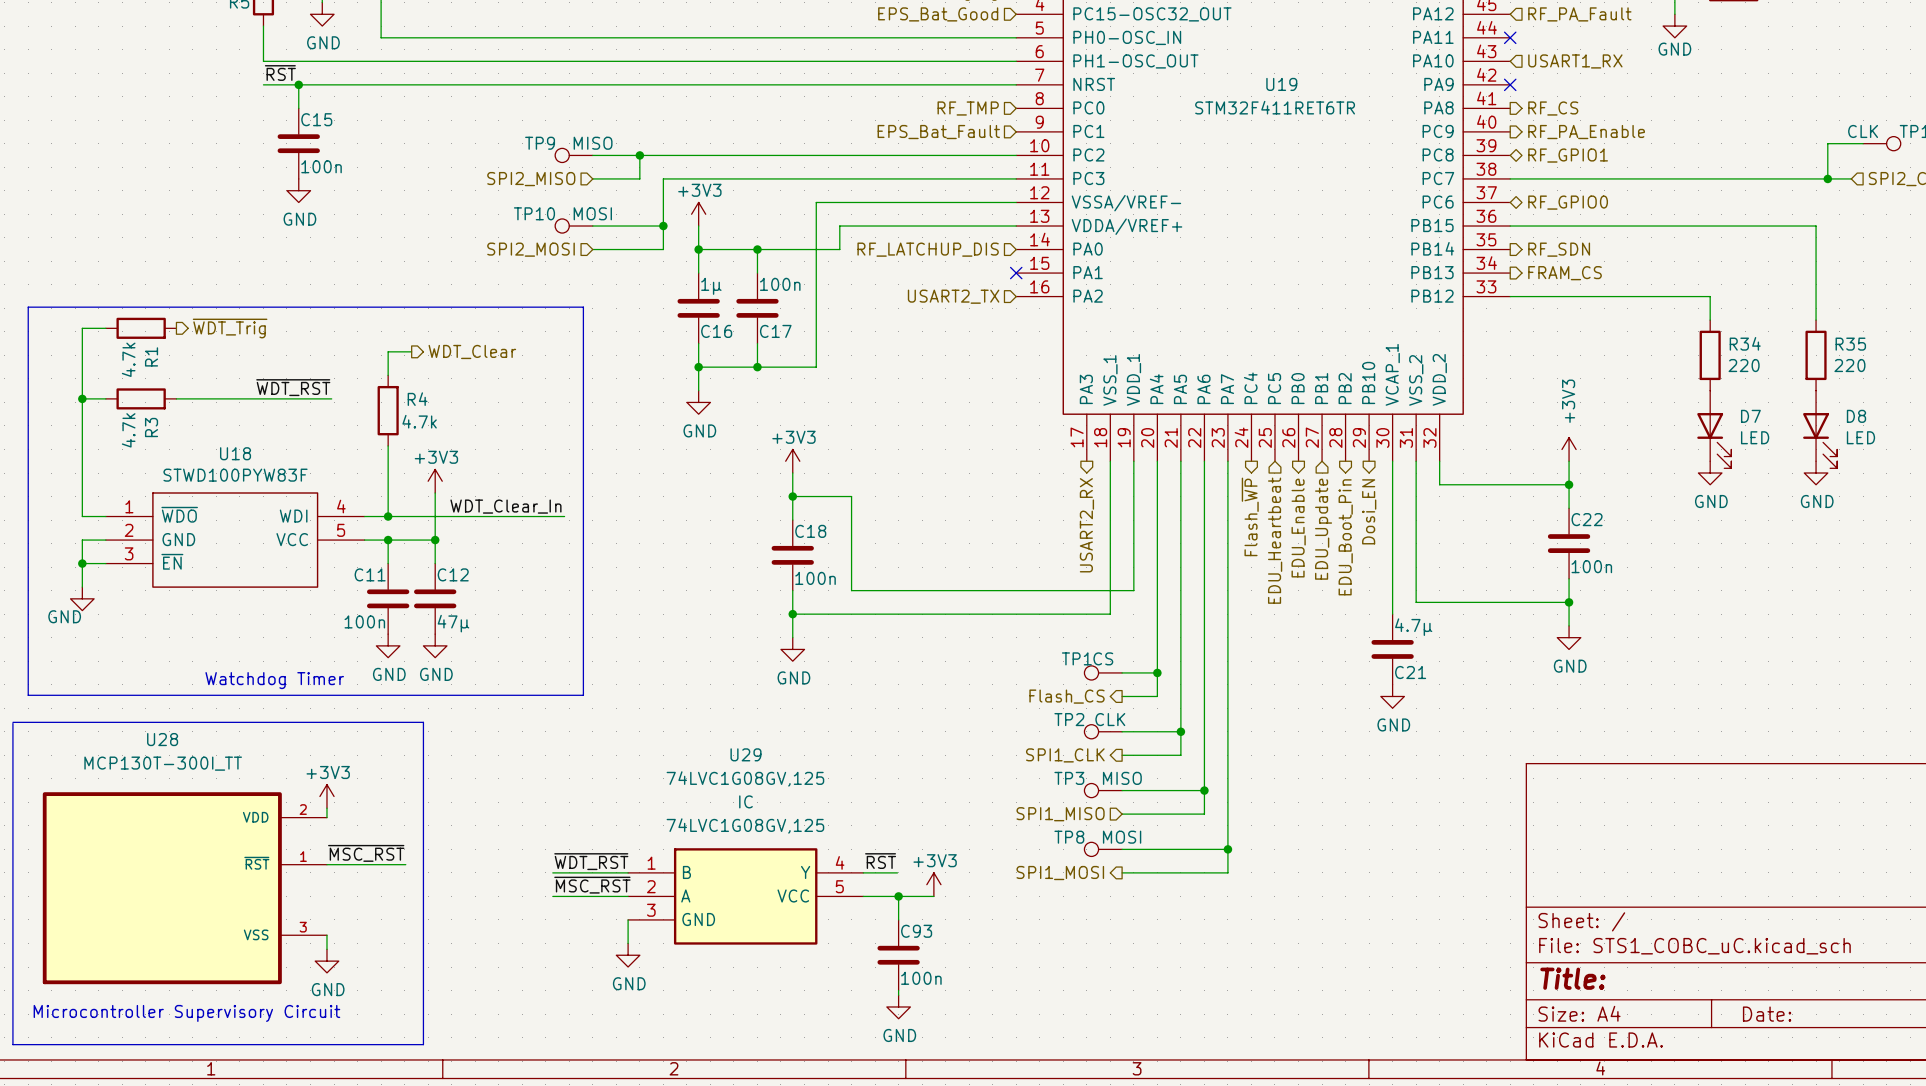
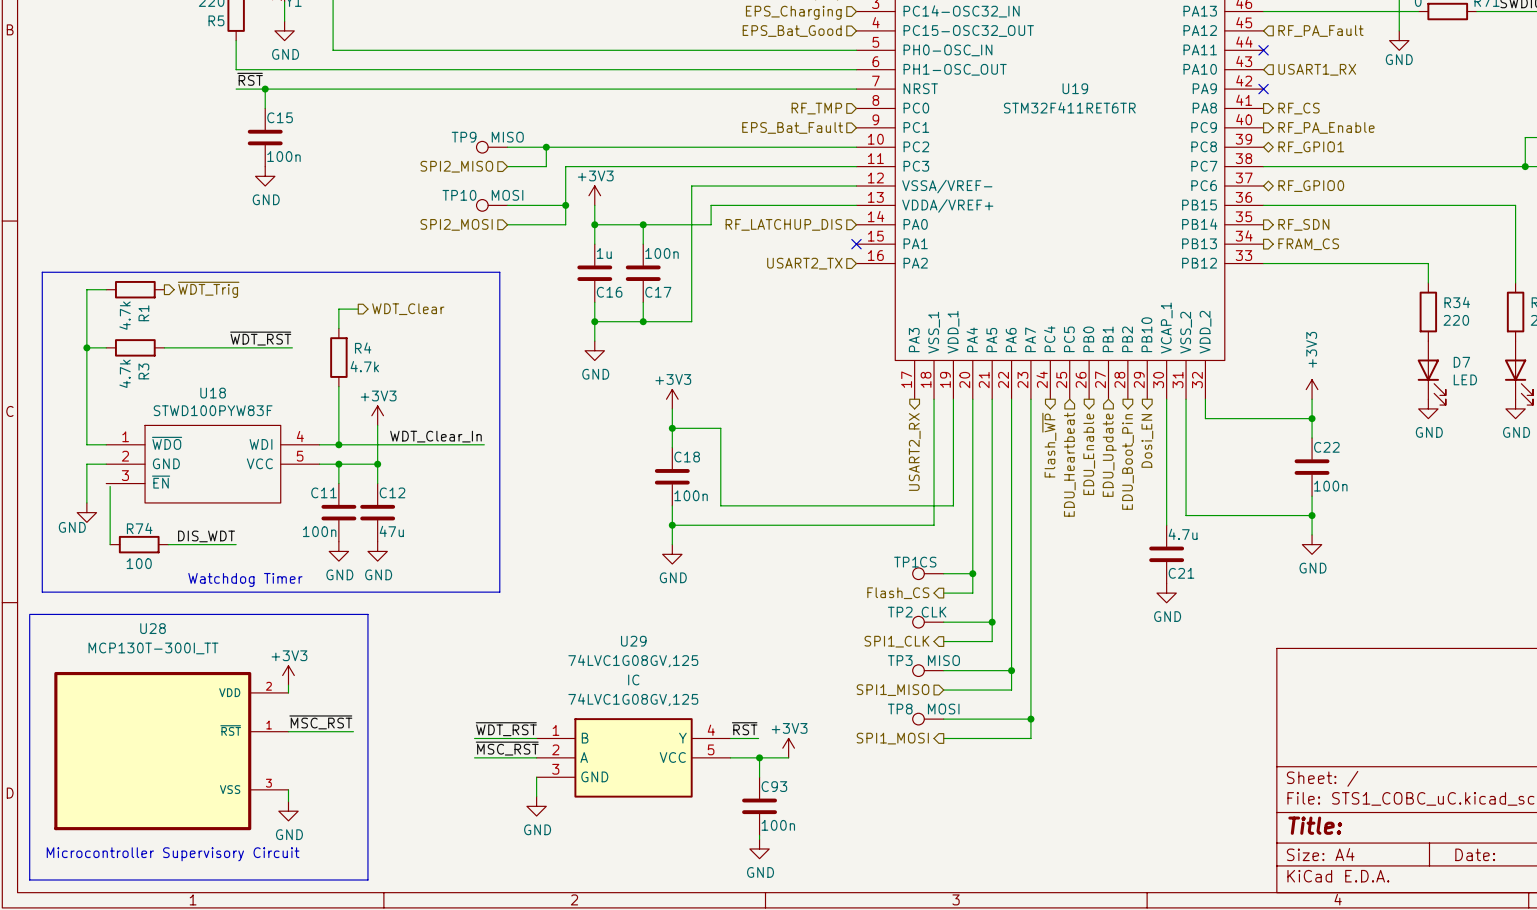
C16 value: 1µ (711, 286) -> 1u (604, 253)
wire: (82, 563) (105, 563) -> none
junction: (82, 563) -> none
wire: none -> (110, 486) (110, 544)
C12 value: 47µ (453, 623) -> 47u (391, 531)
label: none -> DIS_WDT (206, 536)
C21 value: 4.7µ (1413, 627) -> 4.7u (1183, 534)
R74: none -> 100 (139, 544)
wire: none -> (168, 544) (236, 544)

